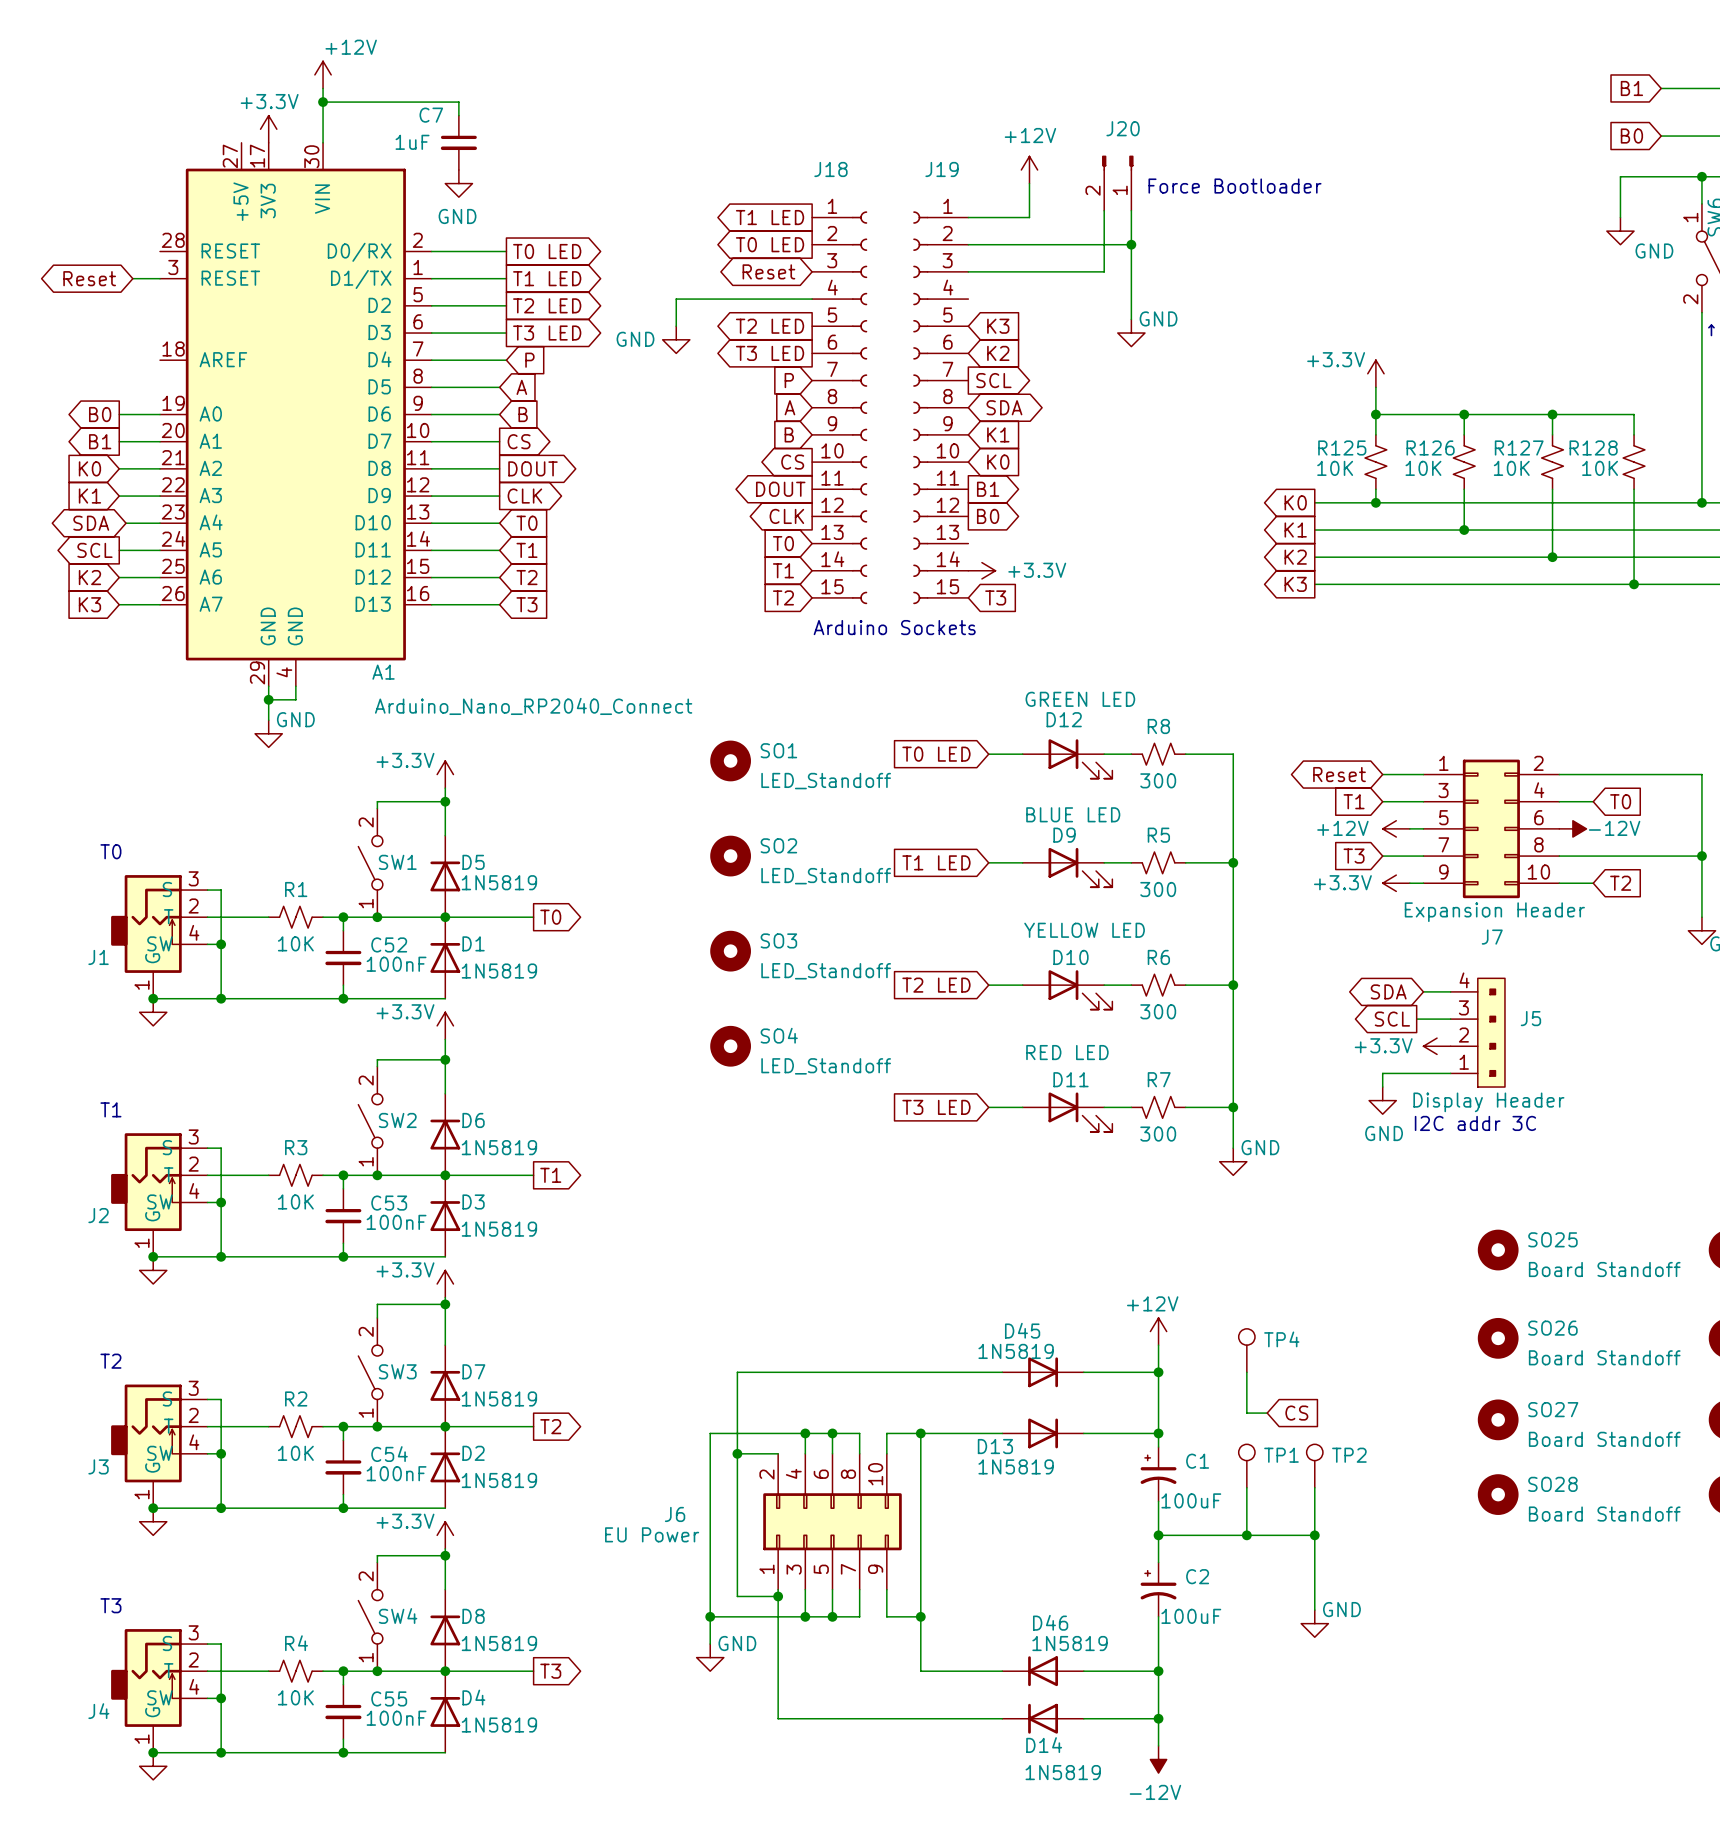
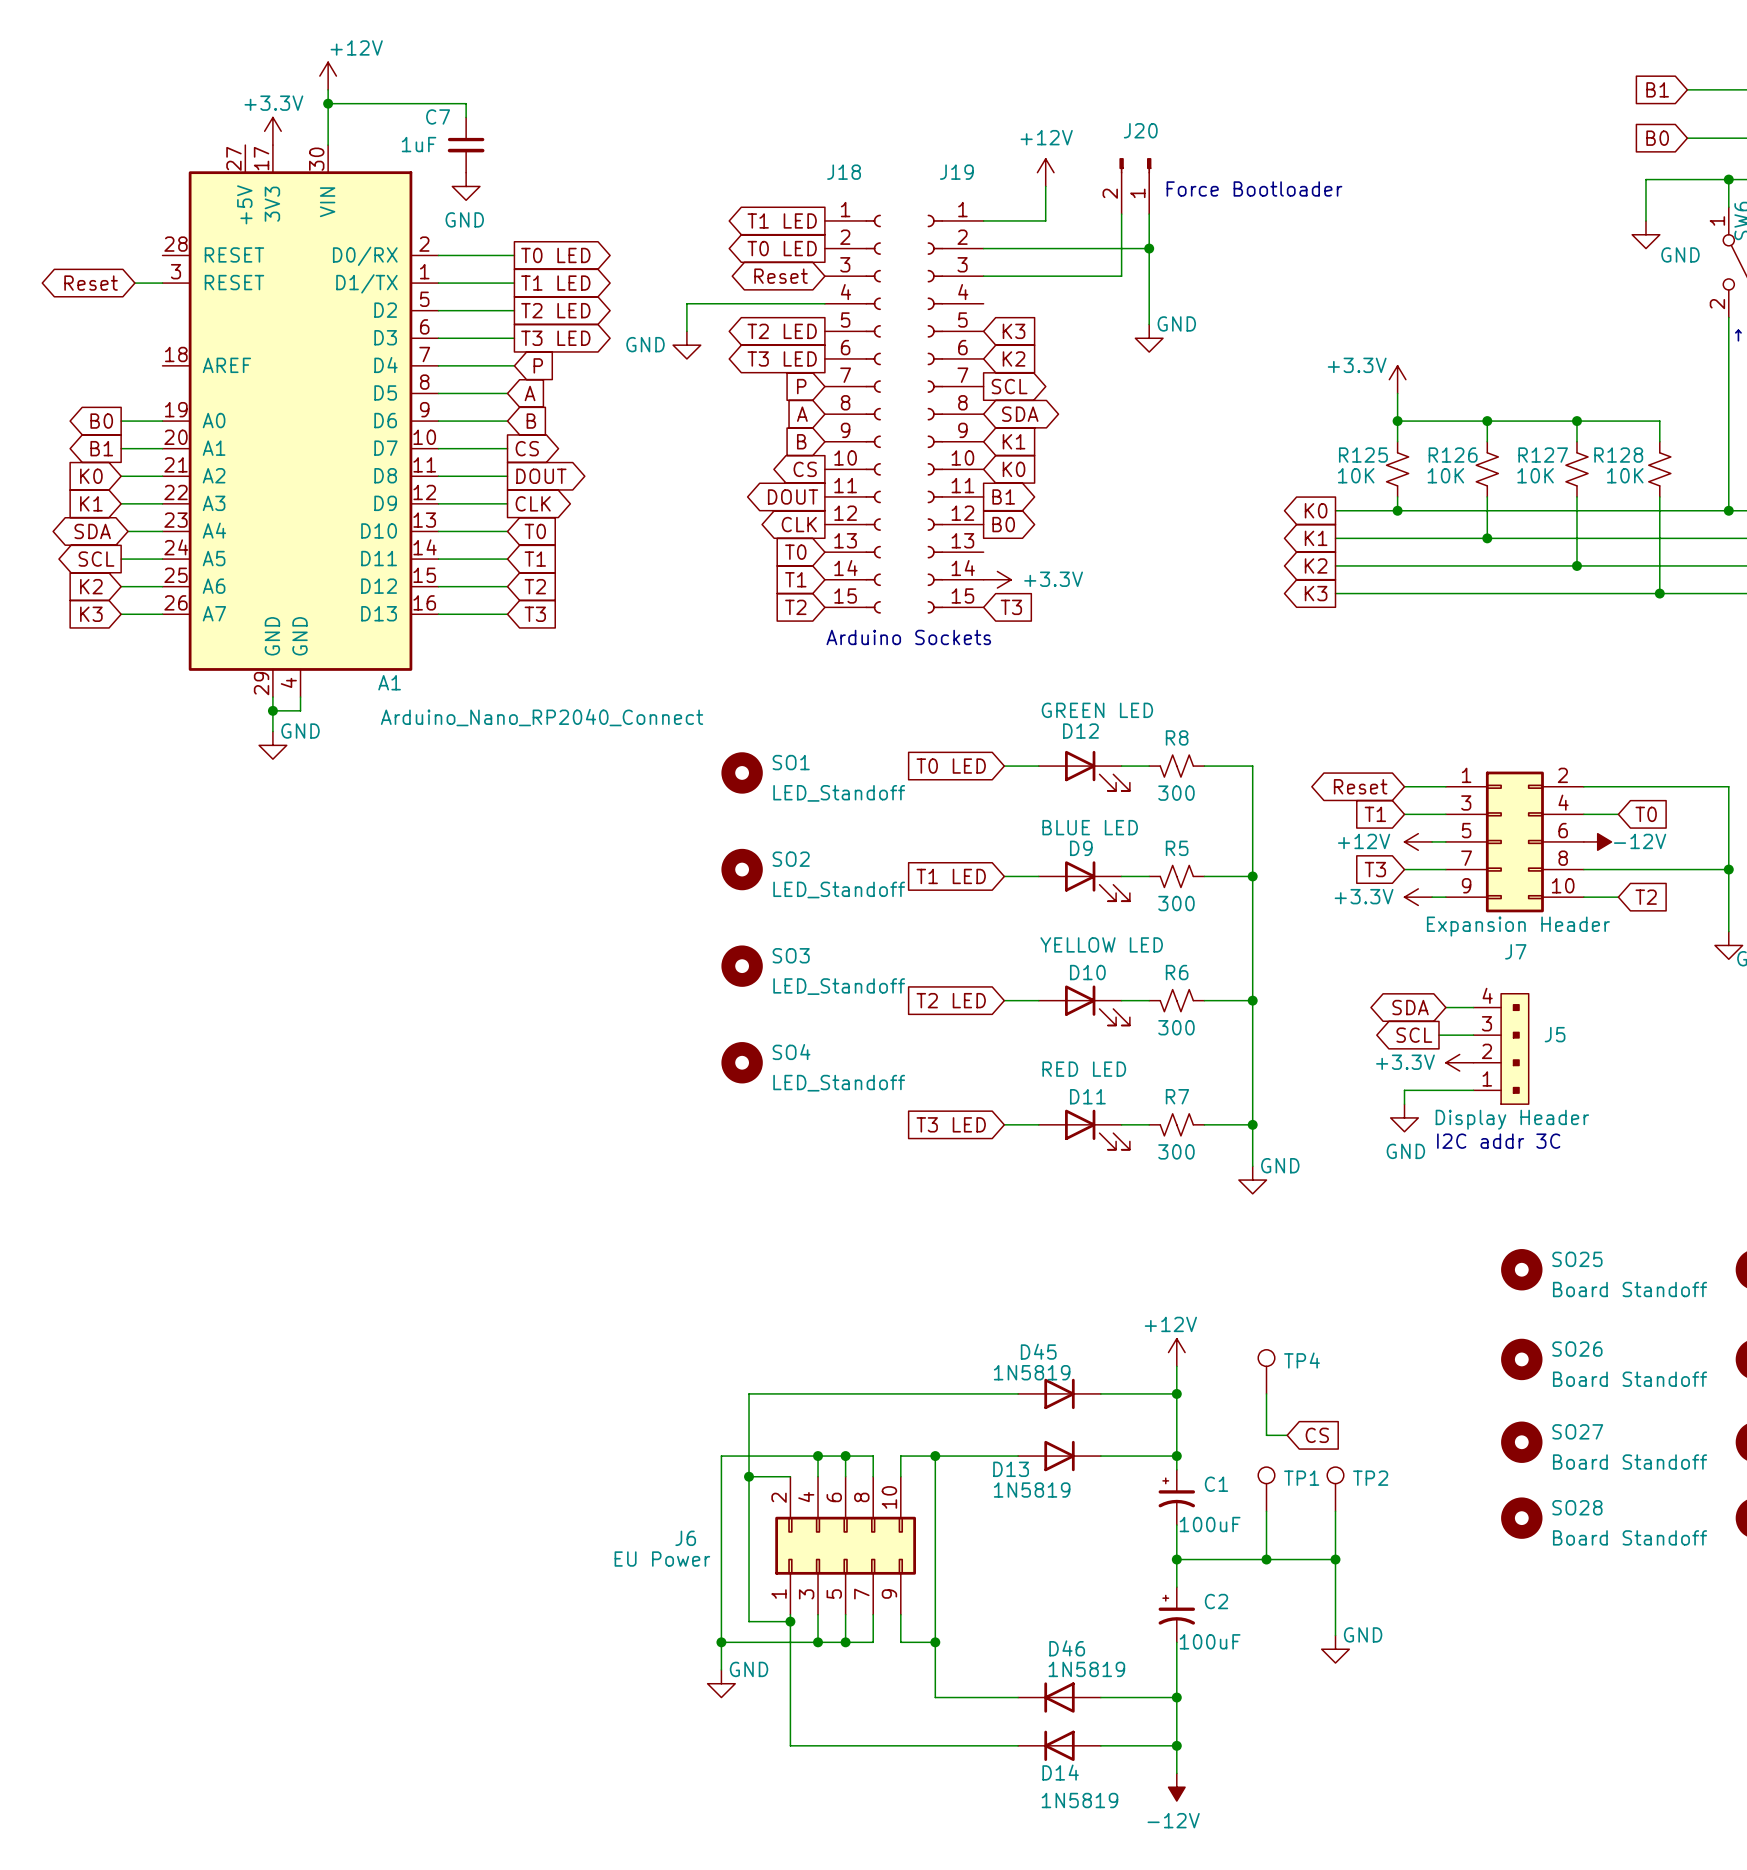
power symbol: +3.3V (445, 774) -> none
wire: (445, 788) (445, 835) -> none
wire: (445, 801) (377, 801) (377, 808) -> none
junction: (445, 801) -> none
text: T0 (110, 851) -> none
SW1: (370, 862) -> none
D5: 1N5819 (445, 876) -> none
wire: (207, 890) (221, 890) (221, 998) -> none
wire: (207, 917) (268, 917) -> none
R1: 10K (295, 917) -> none
wire: (323, 917) (533, 917) -> none
wire: (343, 917) (343, 930) -> none
junction: (343, 917) -> none
junction: (377, 917) -> none
junction: (445, 917) -> none
global label: T0 (550, 917) -> none
J1: (159, 936) -> none
wire: (207, 944) (221, 944) -> none
junction: (221, 944) -> none
C52: 100nF (343, 957) -> none
D1: 1N5819 (445, 957) -> none
wire: (343, 985) (343, 998) -> none
wire: (153, 998) (445, 998) -> none
junction: (153, 998) -> none
junction: (221, 998) -> none
junction: (343, 998) -> none
power symbol: (153, 1012) -> none
power symbol: +3.3V (445, 1025) -> none
wire: (445, 1039) (445, 1093) -> none
wire: (445, 1059) (377, 1059) (377, 1066) -> none
junction: (445, 1059) -> none
text: T1 (110, 1109) -> none
SW2: (370, 1120) -> none
D6: 1N5819 (445, 1134) -> none
wire: (207, 1148) (221, 1148) (221, 1256) -> none
wire: (207, 1175) (268, 1175) -> none
R3: 10K (295, 1175) -> none
wire: (323, 1175) (533, 1175) -> none
wire: (343, 1175) (343, 1188) -> none
junction: (343, 1175) -> none
junction: (377, 1175) -> none
junction: (445, 1175) -> none
global label: T1 (550, 1175) -> none
J2: (159, 1195) -> none
wire: (207, 1202) (221, 1202) -> none
junction: (221, 1202) -> none
C53: 100nF (343, 1216) -> none
D3: 1N5819 (445, 1216) -> none
wire: (343, 1243) (343, 1256) -> none
wire: (153, 1256) (445, 1256) -> none
junction: (153, 1256) -> none
junction: (221, 1256) -> none
junction: (343, 1256) -> none
power symbol: (153, 1270) -> none
power symbol: +3.3V (445, 1284) -> none
wire: (445, 1297) (445, 1345) -> none
wire: (445, 1304) (377, 1304) (377, 1317) -> none
junction: (445, 1304) -> none
text: T2 (110, 1361) -> none
SW3: (370, 1372) -> none
D7: 1N5819 (445, 1385) -> none
wire: (207, 1399) (221, 1399) (221, 1508) -> none
wire: (207, 1426) (268, 1426) -> none
R2: 10K (295, 1426) -> none
wire: (323, 1426) (533, 1426) -> none
wire: (343, 1426) (343, 1440) -> none
junction: (343, 1426) -> none
junction: (377, 1426) -> none
junction: (445, 1426) -> none
global label: T2 (550, 1426) -> none
J3: (159, 1446) -> none
wire: (207, 1453) (221, 1453) -> none
junction: (221, 1453) -> none
C54: 100nF (343, 1467) -> none
D2: 1N5819 (445, 1467) -> none
wire: (343, 1494) (343, 1508) -> none
wire: (153, 1508) (445, 1508) -> none
junction: (153, 1508) -> none
junction: (221, 1508) -> none
junction: (343, 1508) -> none
power symbol: (153, 1521) -> none
power symbol: +3.3V (445, 1535) -> none
wire: (445, 1548) (445, 1589) -> none
wire: (445, 1555) (377, 1555) (377, 1562) -> none
junction: (445, 1555) -> none
text: T3 (110, 1605) -> none
SW4: (370, 1616) -> none
D8: 1N5819 (445, 1630) -> none
wire: (207, 1644) (221, 1644) (221, 1752) -> none
wire: (207, 1671) (268, 1671) -> none
R4: 10K (295, 1671) -> none
wire: (323, 1671) (533, 1671) -> none
wire: (343, 1671) (343, 1684) -> none
junction: (343, 1671) -> none
junction: (377, 1671) -> none
junction: (445, 1671) -> none
global label: T3 (550, 1671) -> none
J4: (159, 1690) -> none
wire: (207, 1698) (221, 1698) -> none
junction: (221, 1698) -> none
C55: 100nF (343, 1711) -> none
D4: 1N5819 (445, 1711) -> none
wire: (343, 1739) (343, 1752) -> none
wire: (153, 1752) (445, 1752) -> none
junction: (153, 1752) -> none
junction: (221, 1752) -> none
junction: (343, 1752) -> none
power symbol: (153, 1766) -> none

